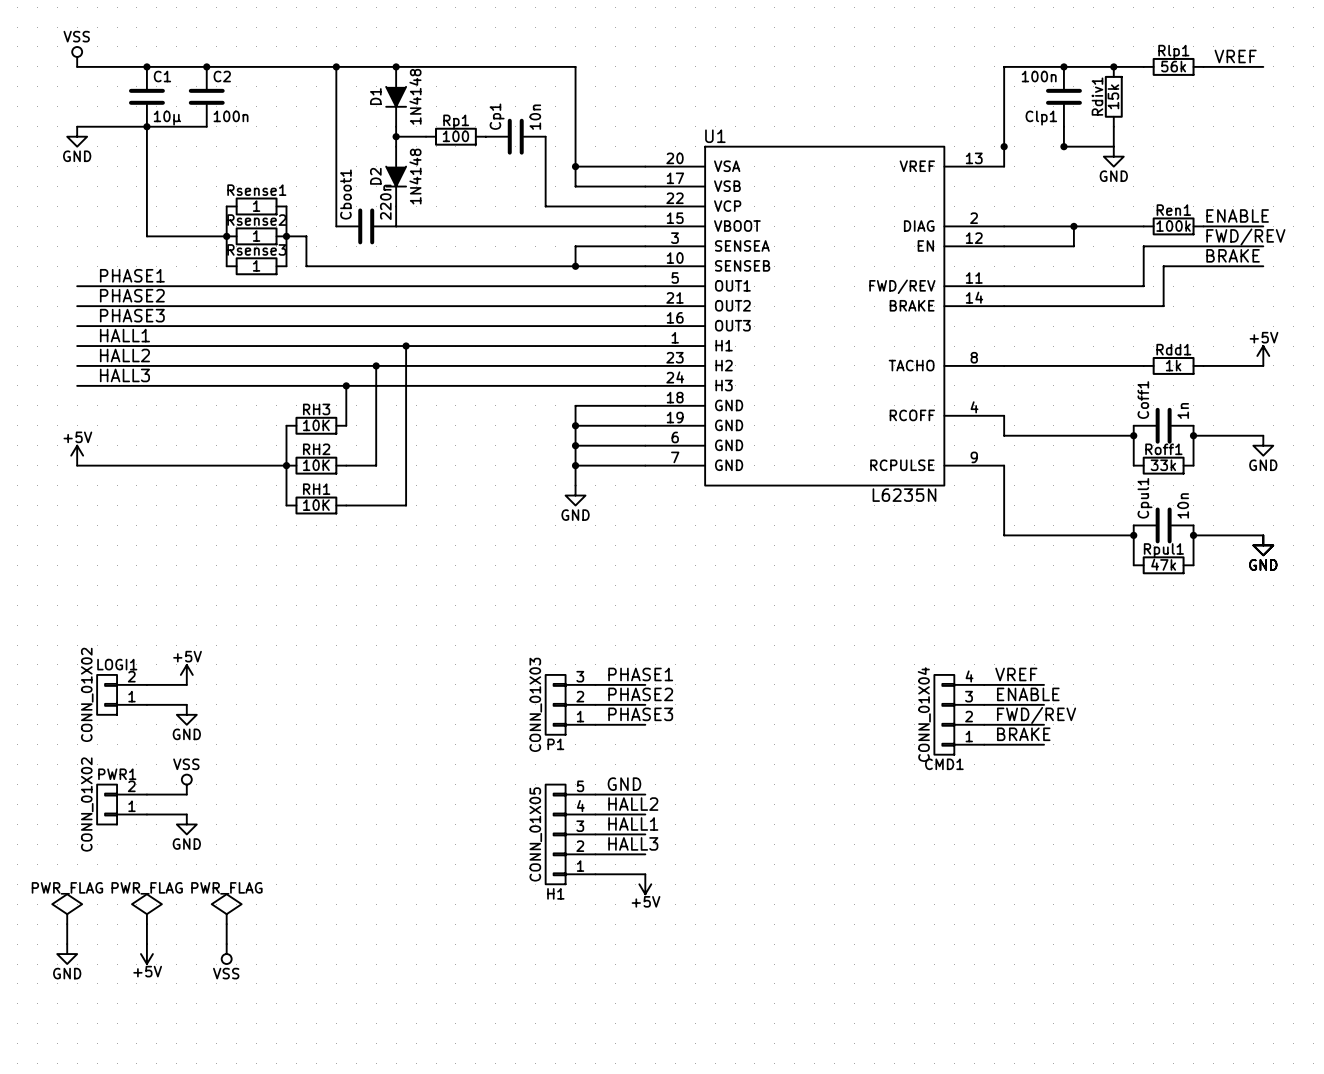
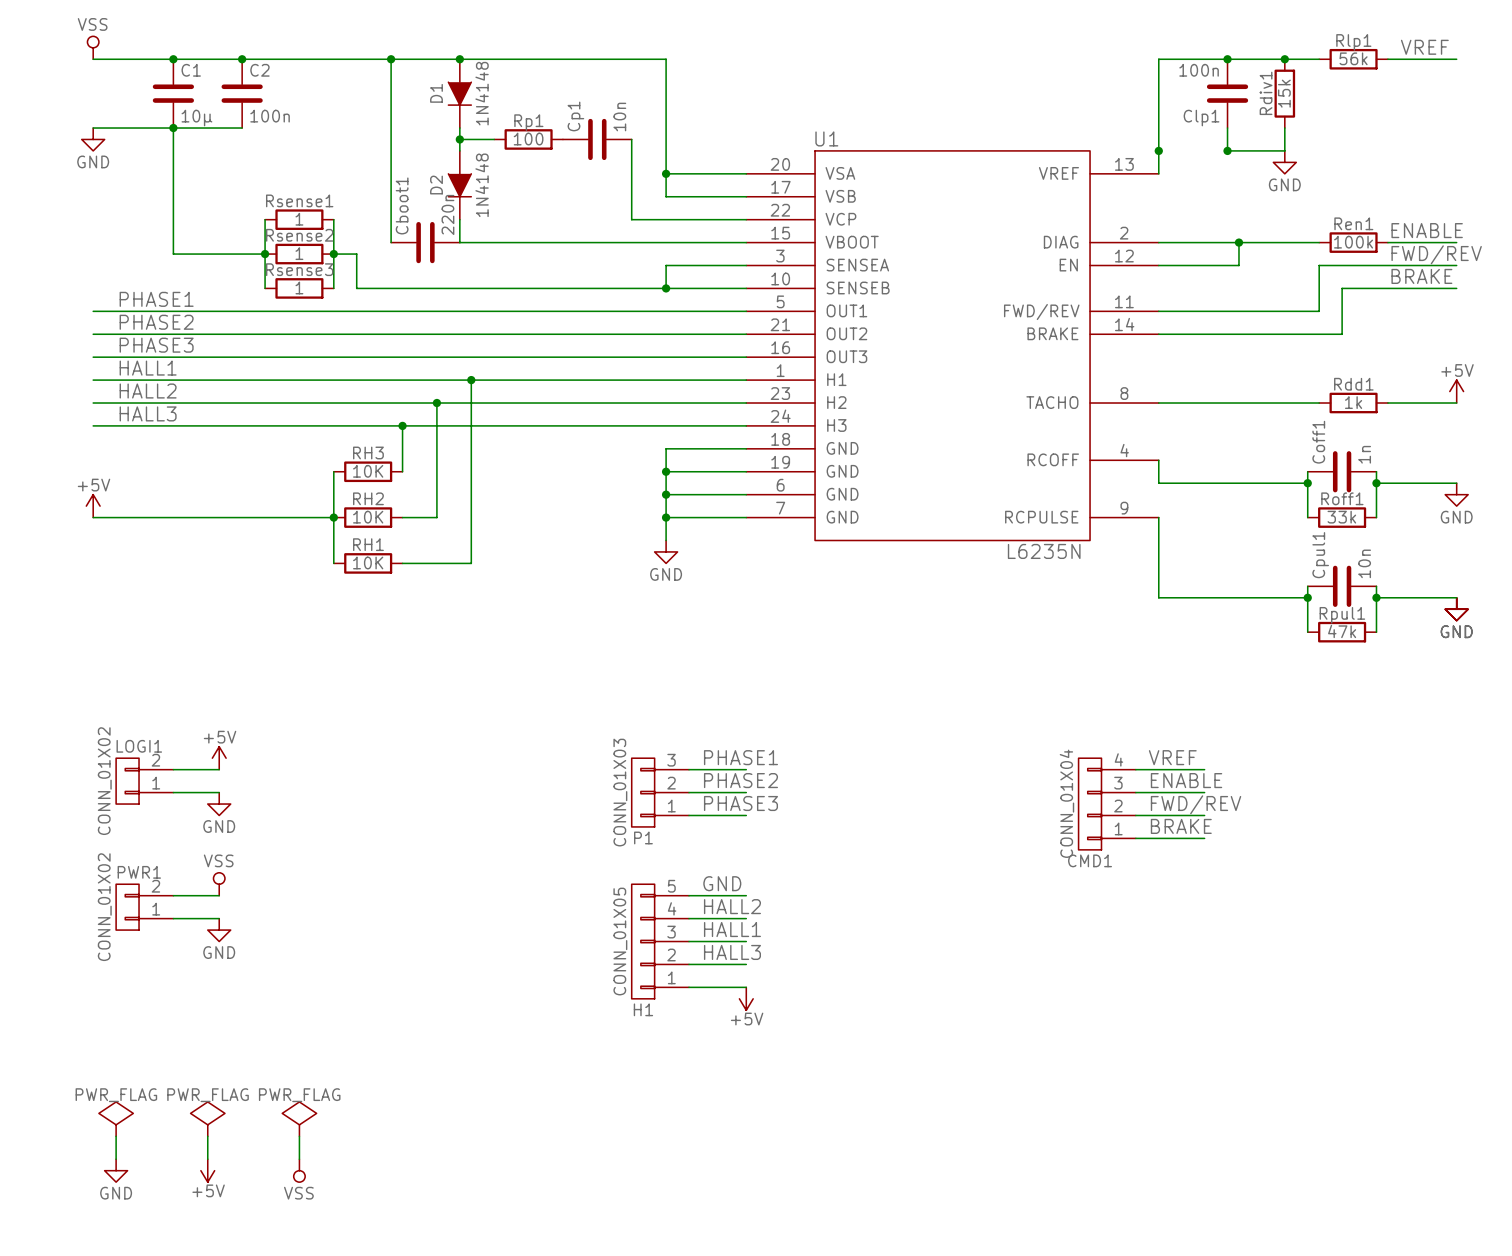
power symbol: PWR_FLAG (67, 909) -> none
power symbol: PWR_FLAG (146, 909) -> none
power symbol: PWR_FLAG (226, 909) -> none
wire: (67, 924) (67, 944) -> (116, 1136) (116, 1159)
wire: (146, 924) (146, 944) -> (207, 1136) (207, 1159)
wire: (226, 924) (226, 944) -> (299, 1136) (299, 1159)
power symbol position: GND (67, 954) -> GND (116, 1170)
power symbol position: +5V (146, 954) -> +5V (207, 1170)
power symbol position: VSS (226, 954) -> VSS (299, 1170)
power symbol: none -> PWR_FLAG (116, 1119)
power symbol: none -> PWR_FLAG (207, 1119)
power symbol: none -> PWR_FLAG (299, 1119)

